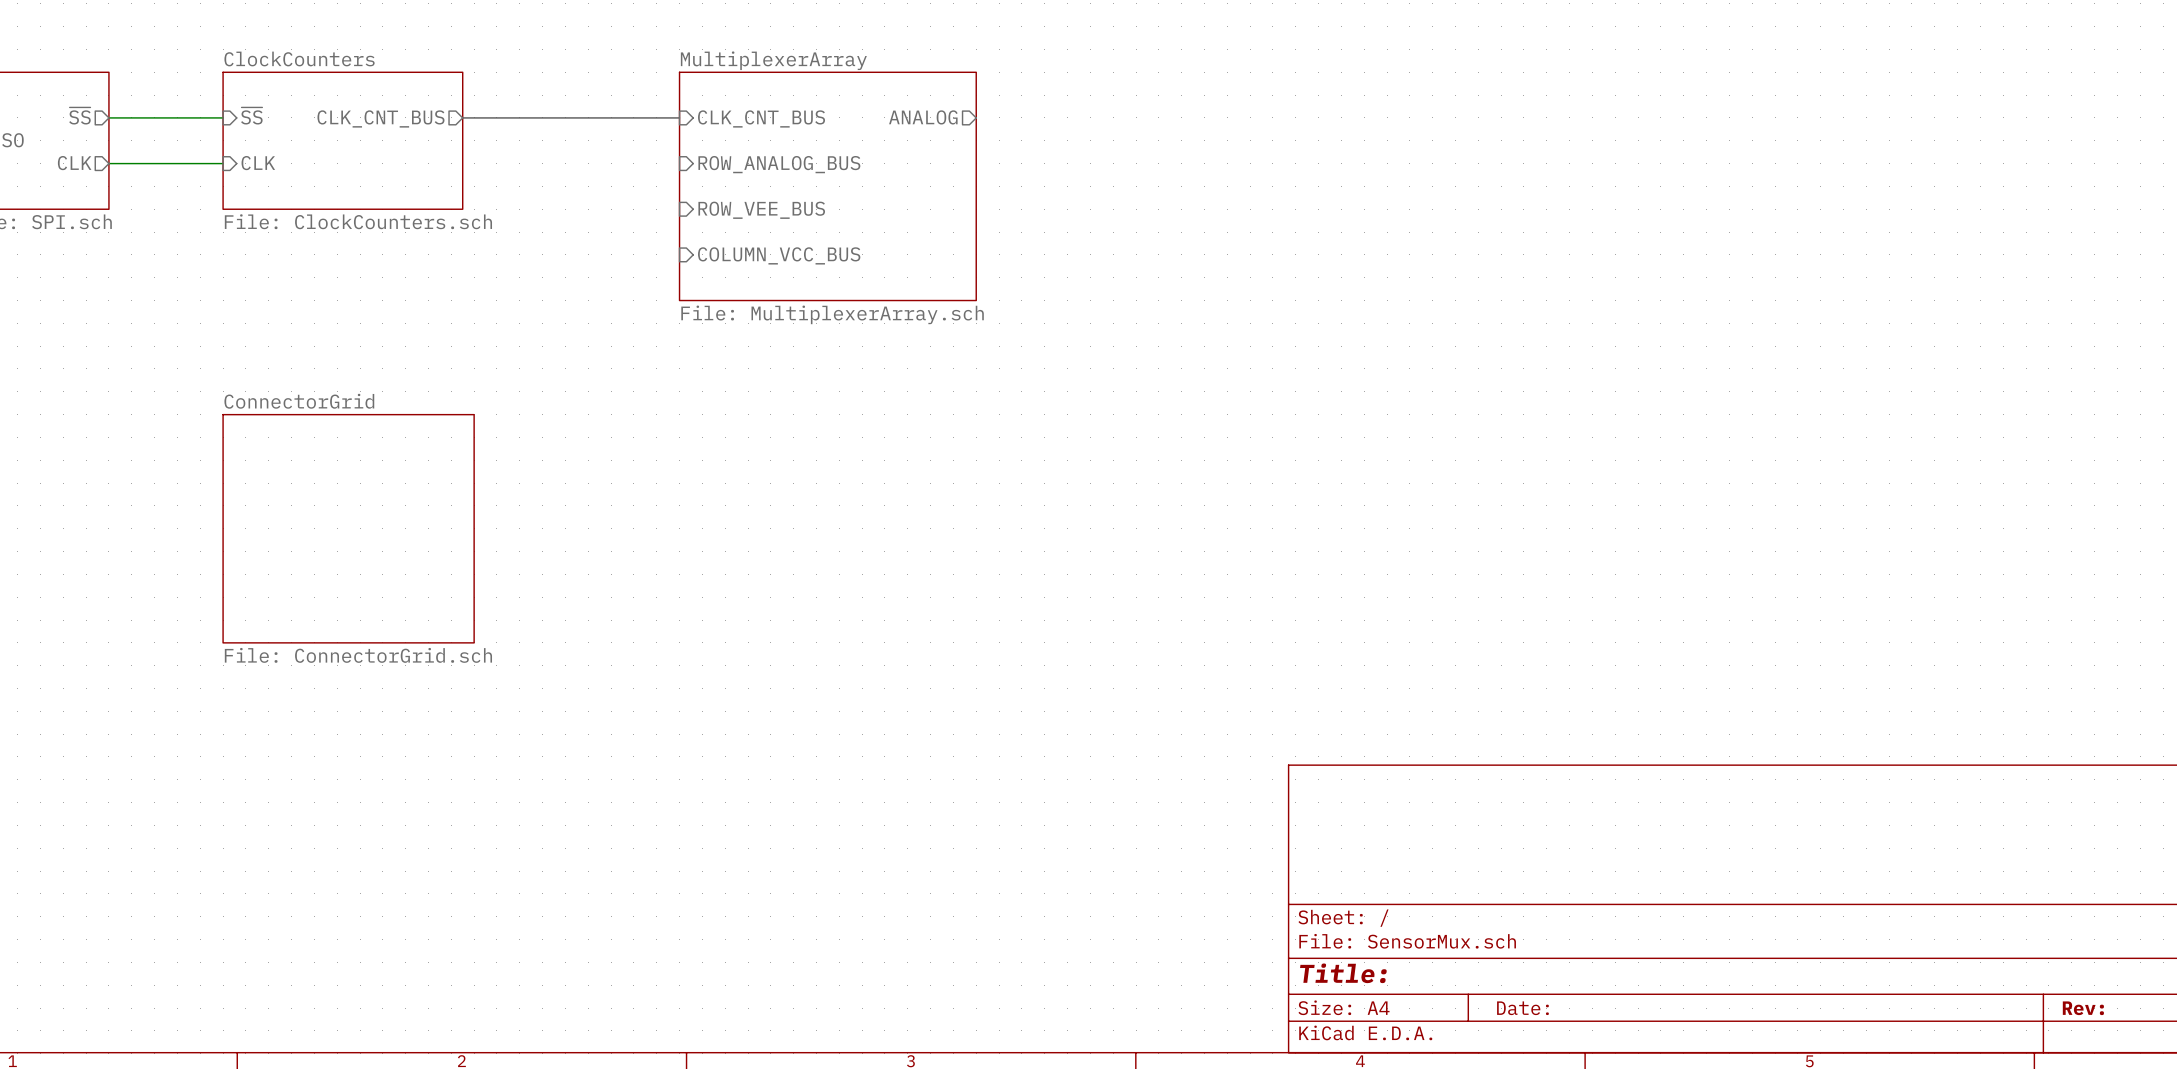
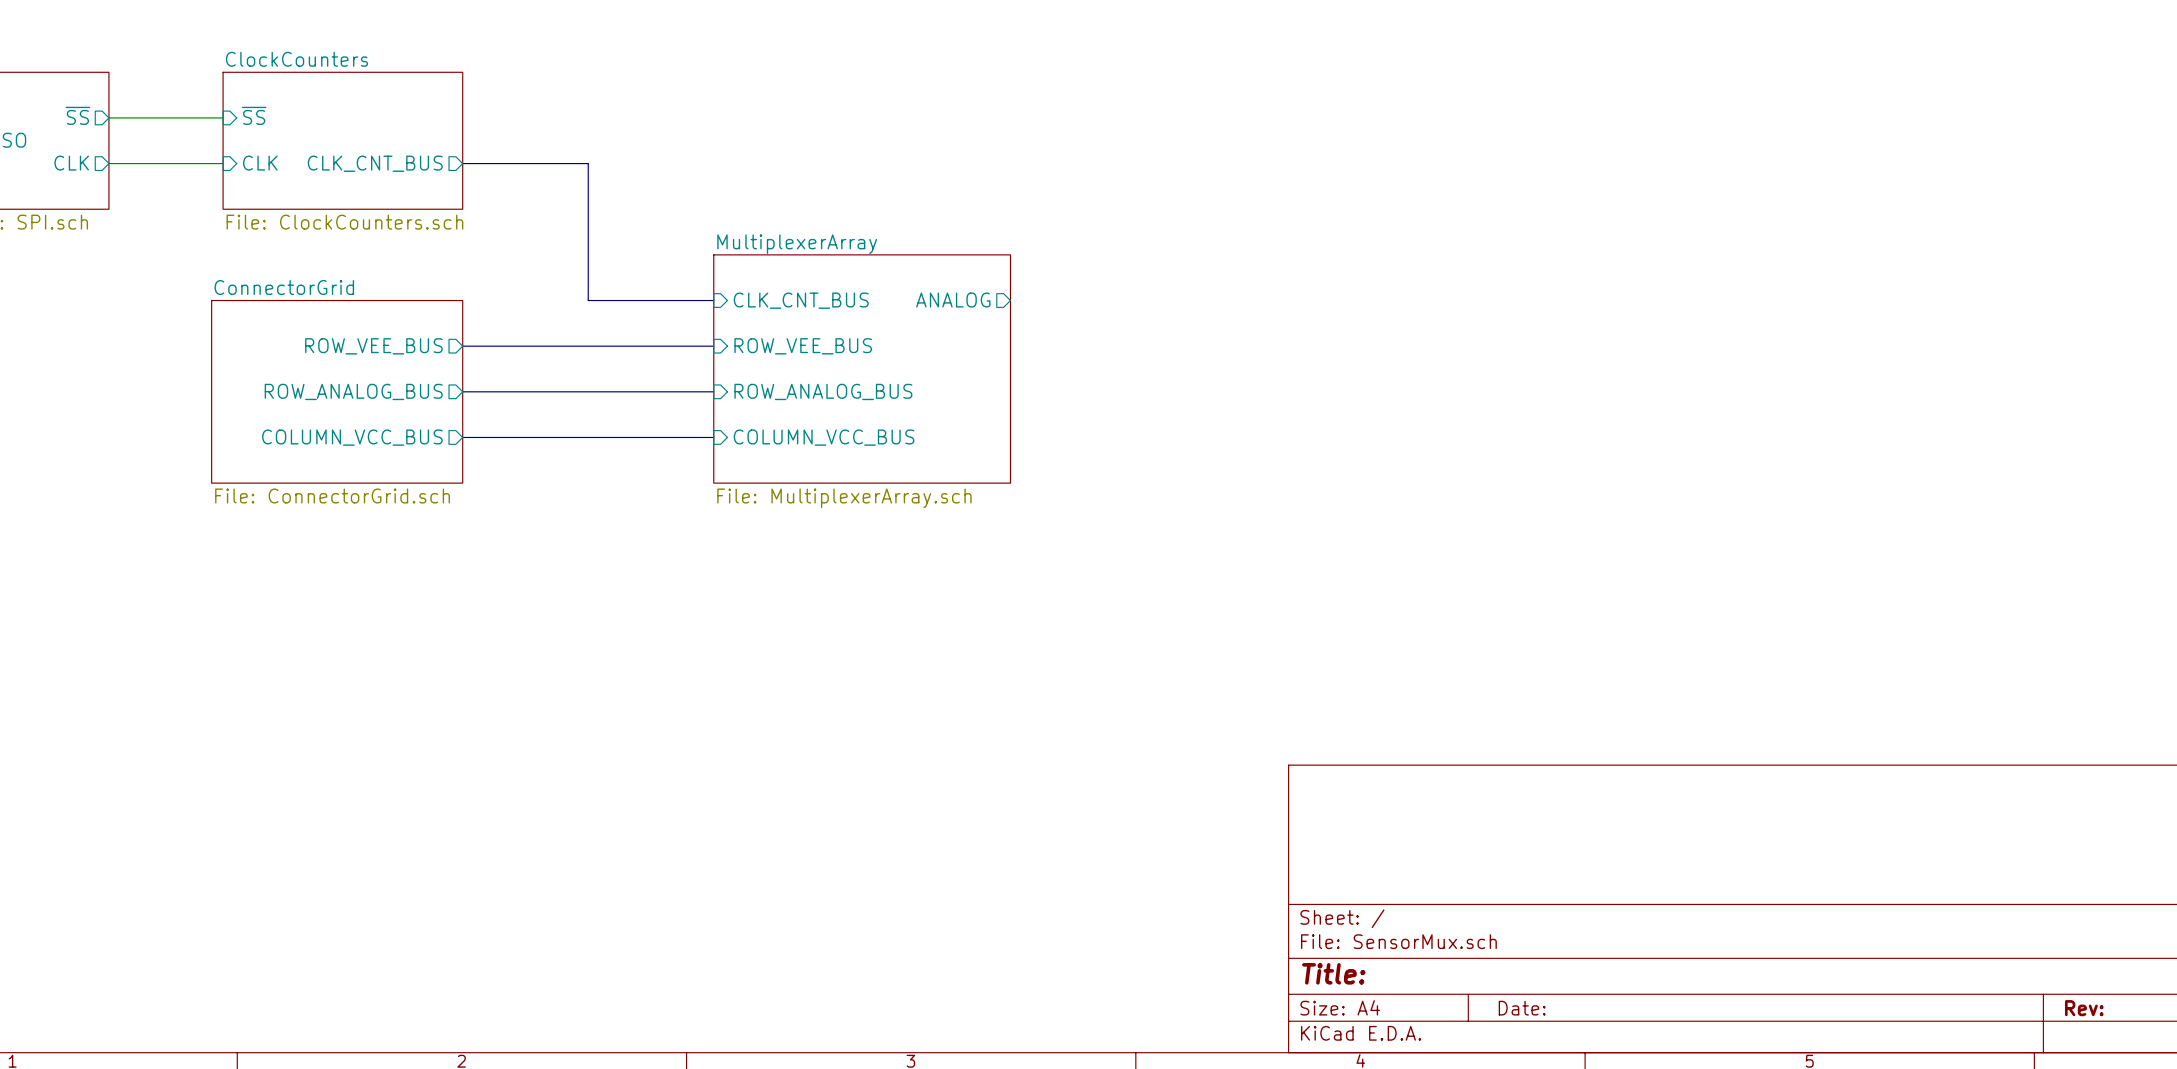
bus: (462, 117) (679, 117) -> none
sheet pin position: ANALOG (923, 117) -> ANALOG (953, 300)
sheet pin position: CLK_CNT_BUS (380, 118) -> CLK_CNT_BUS (375, 163)
sheet pin: CLK_CNT_BUS (761, 118) -> none
bus: none -> (462, 163) (588, 163) (588, 300) (713, 300)
sheet pin: ROW_ANALOG_BUS (779, 164) -> none
sheet MultiplexerArray position: (827, 186) -> (862, 368)
sheet pin position: ROW_VEE_BUS (761, 210) -> ROW_VEE_BUS (803, 346)
sheet pin: COLUMN_VCC_BUS (779, 255) -> none
sheet pin: none -> CLK_CNT_BUS (801, 300)
bus: none -> (462, 346) (713, 346)
sheet pin: none -> ROW_VEE_BUS (373, 346)
sheet ConnectorGrid: none -> File: ConnectorGrid.sch (337, 391)
bus: none -> (462, 391) (713, 391)
sheet pin: none -> ROW_ANALOG_BUS (353, 391)
sheet pin: none -> ROW_ANALOG_BUS (823, 391)
bus: none -> (462, 437) (713, 437)
sheet pin: none -> COLUMN_VCC_BUS (352, 437)
sheet pin: none -> COLUMN_VCC_BUS (824, 437)
sheet ConnectorGrid: File: ConnectorGrid.sch (348, 528) -> none

